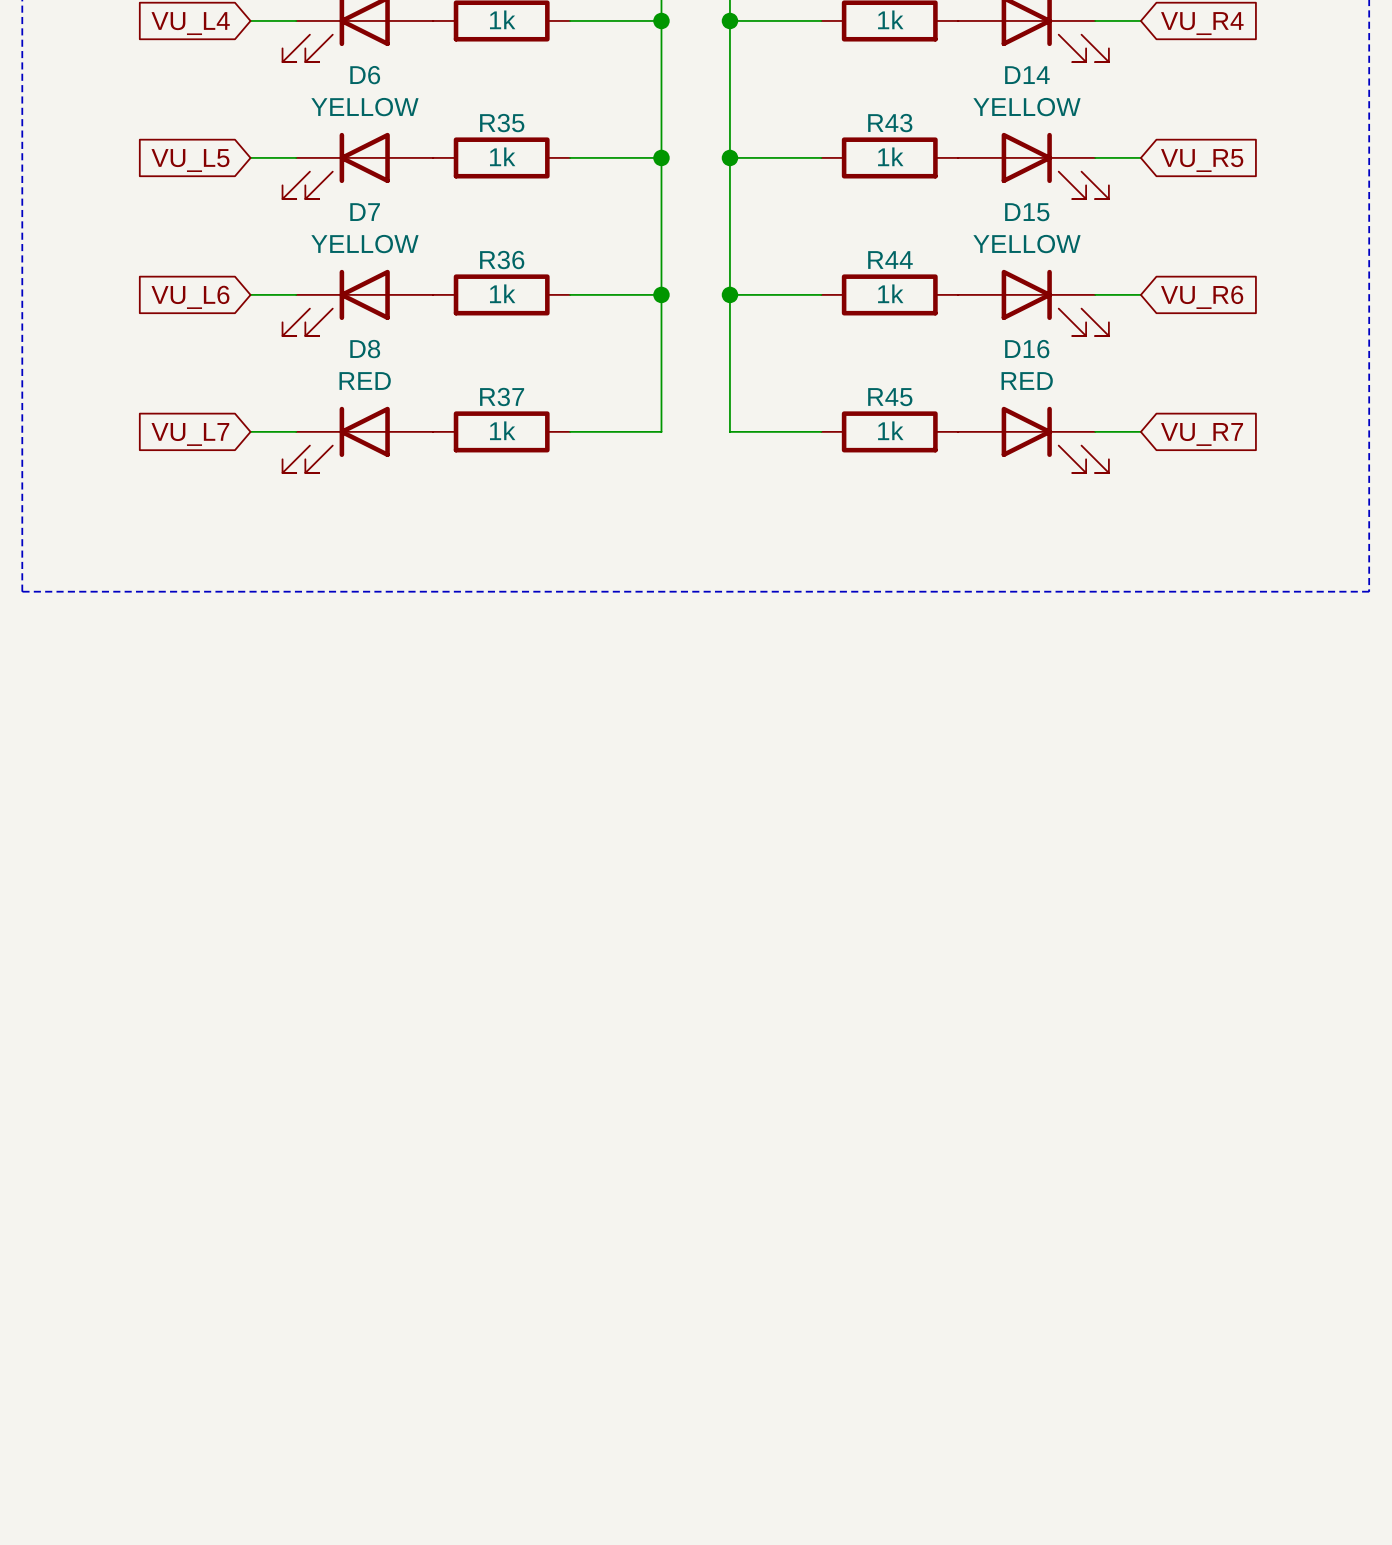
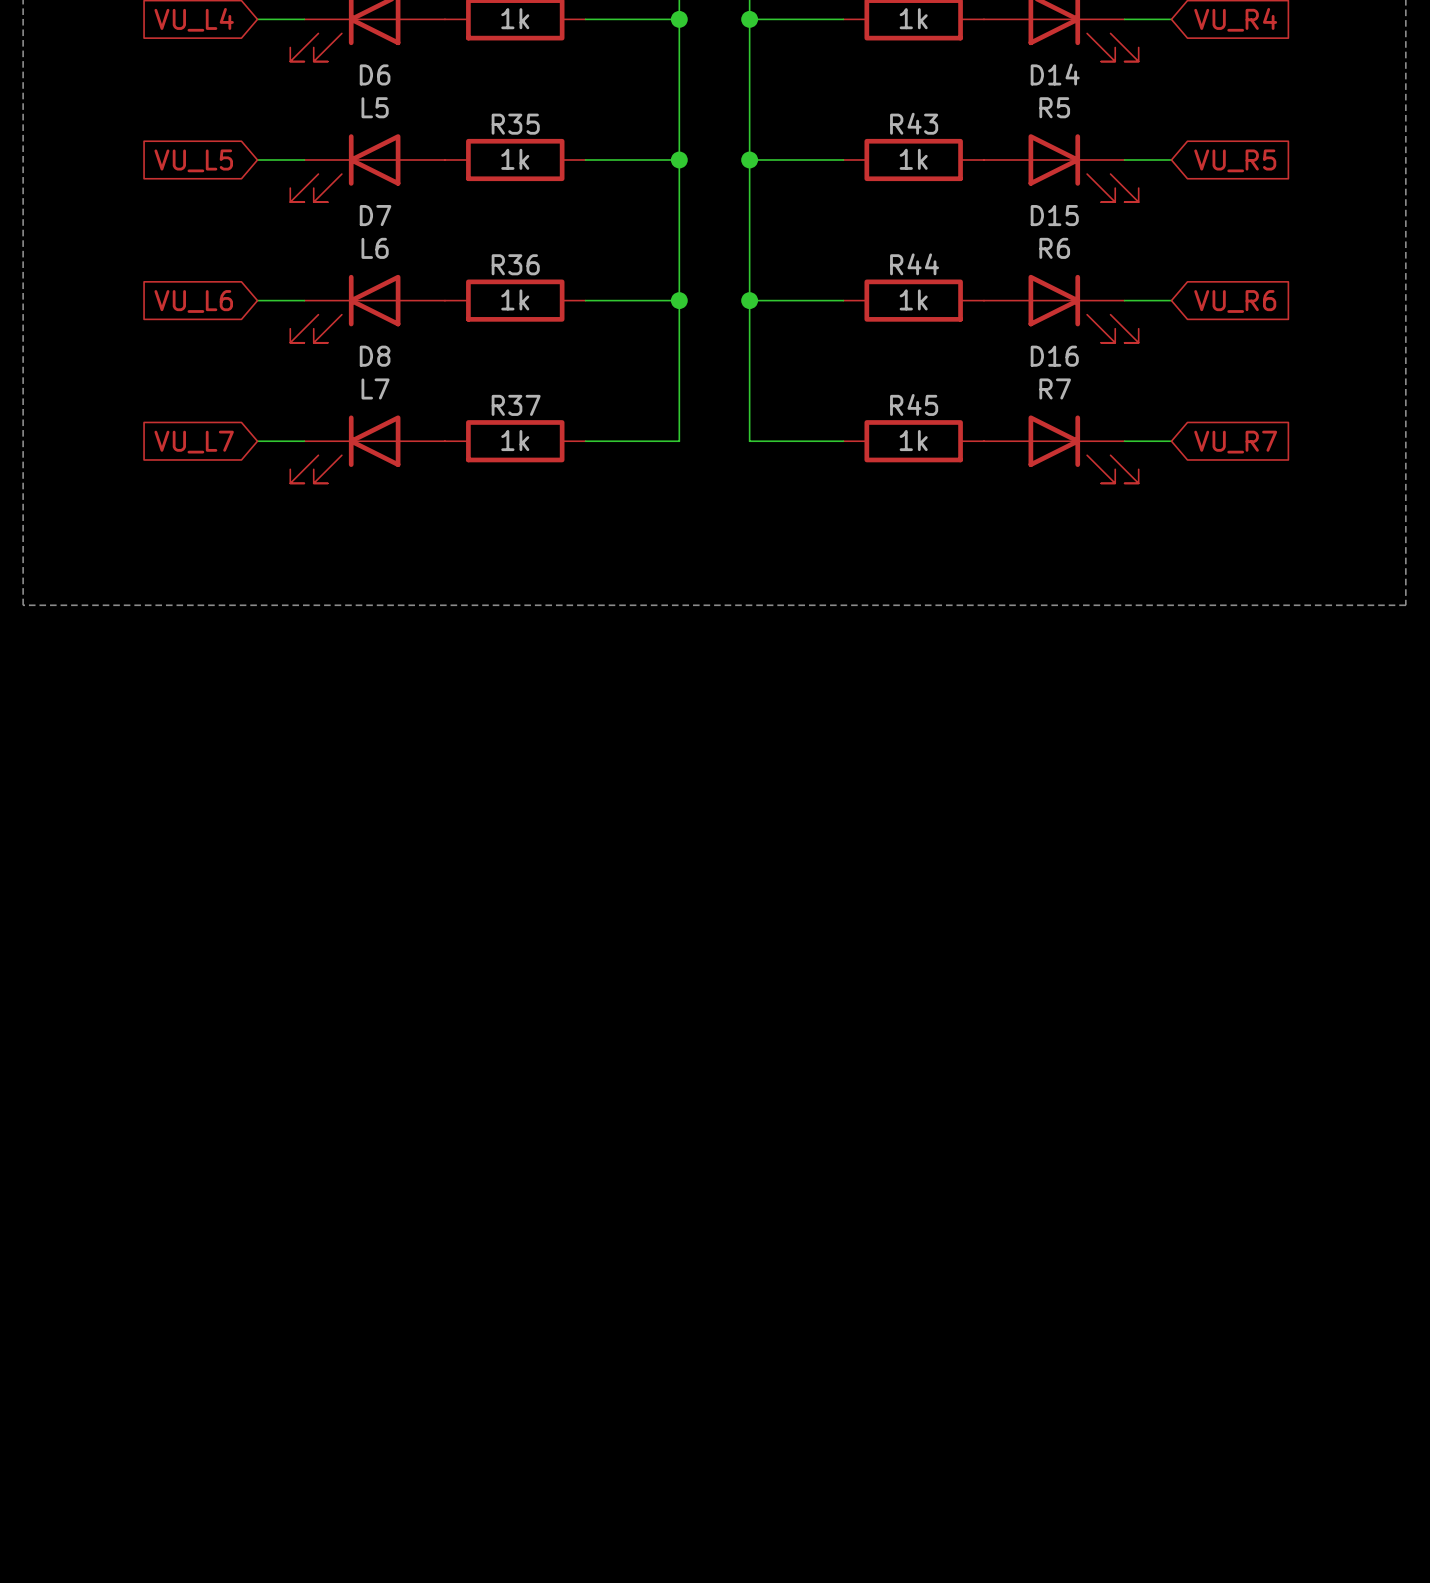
D6 value: YELLOW (364, 107) -> L5 (375, 107)
D14 value: YELLOW (1026, 107) -> R5 (1054, 107)
D7 value: YELLOW (364, 244) -> L6 (375, 248)
D15 value: YELLOW (1026, 244) -> R6 (1054, 248)
D8 value: RED (365, 381) -> L7 (375, 388)
D16 value: RED (1027, 381) -> R7 (1055, 388)

